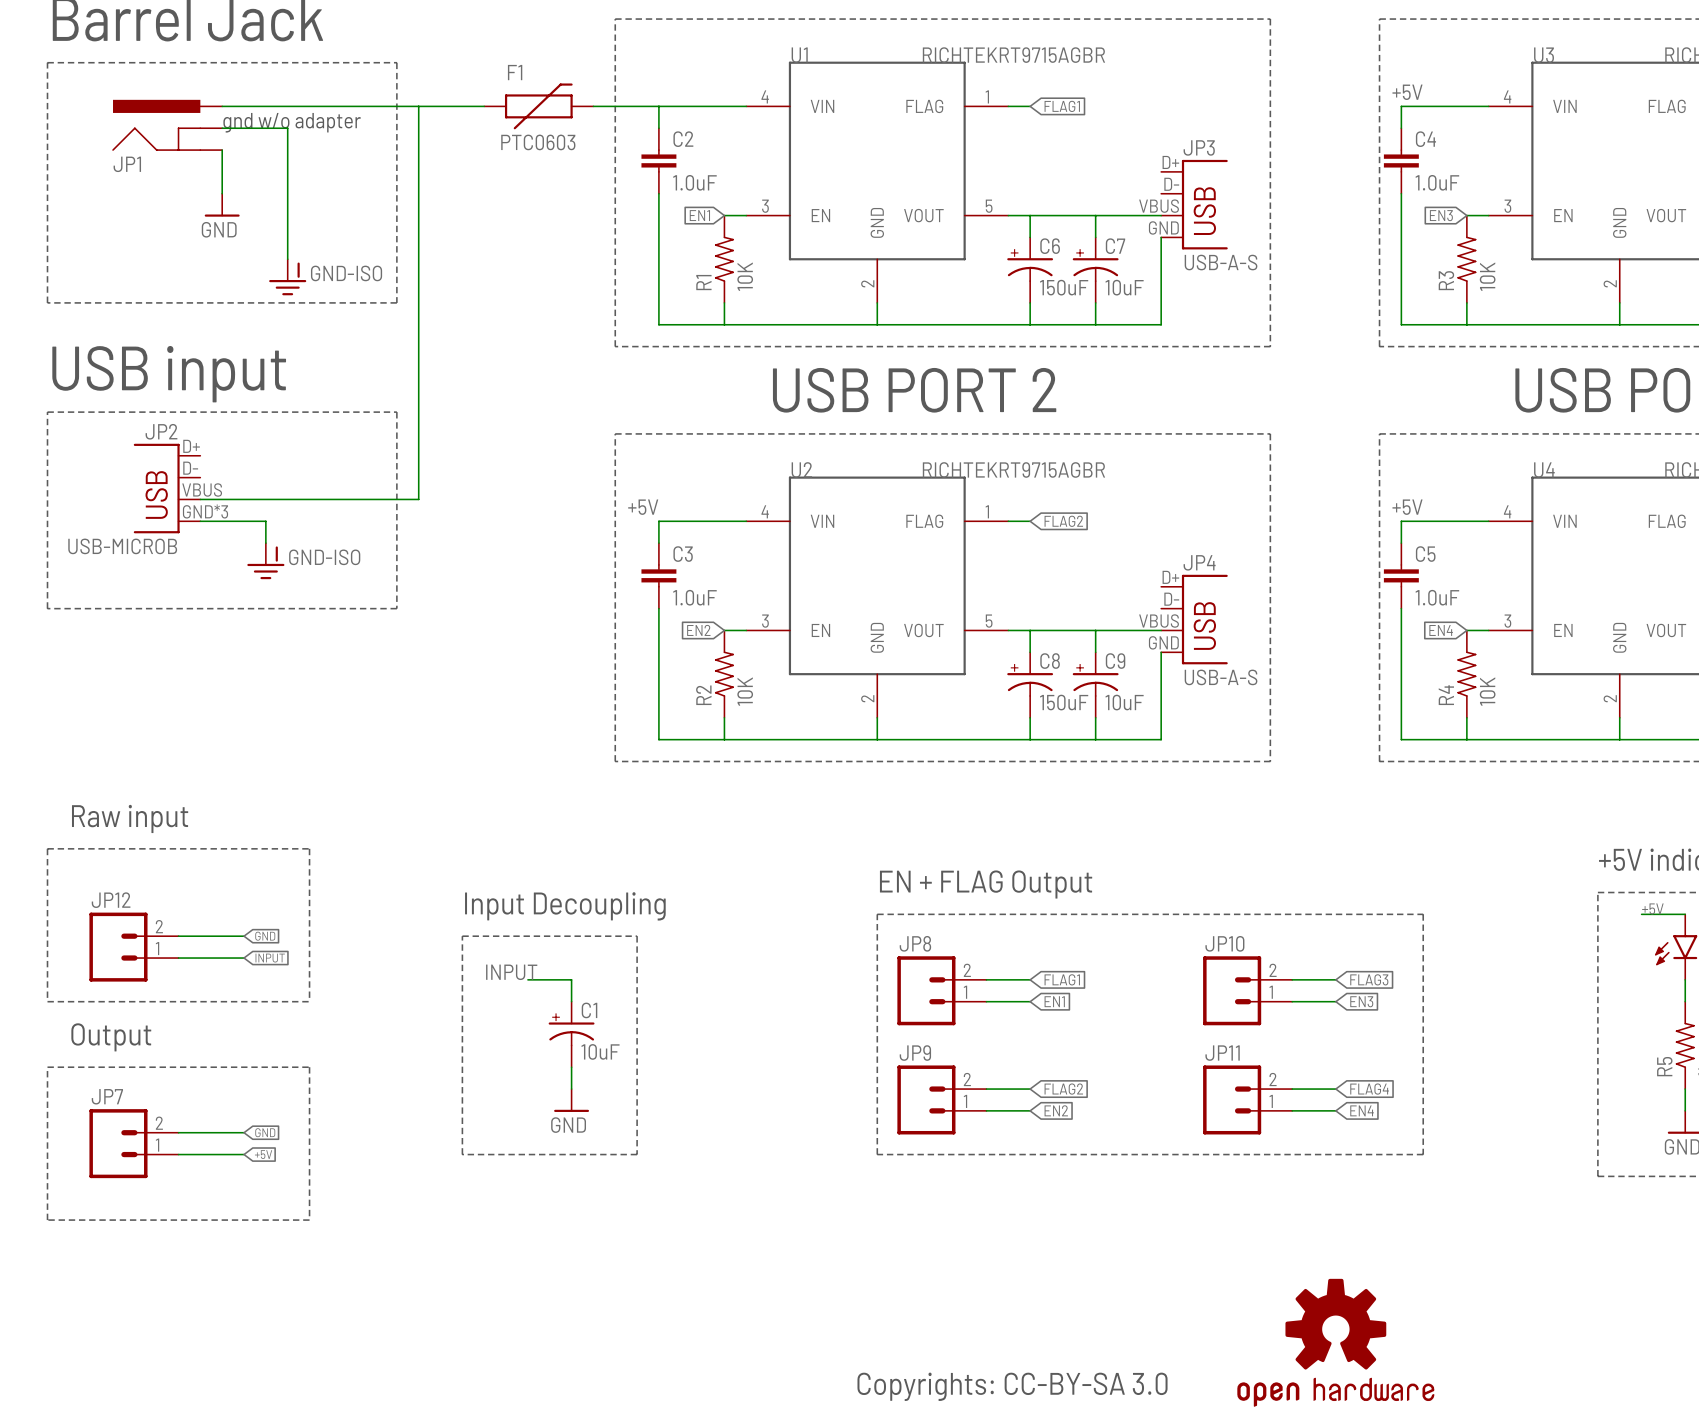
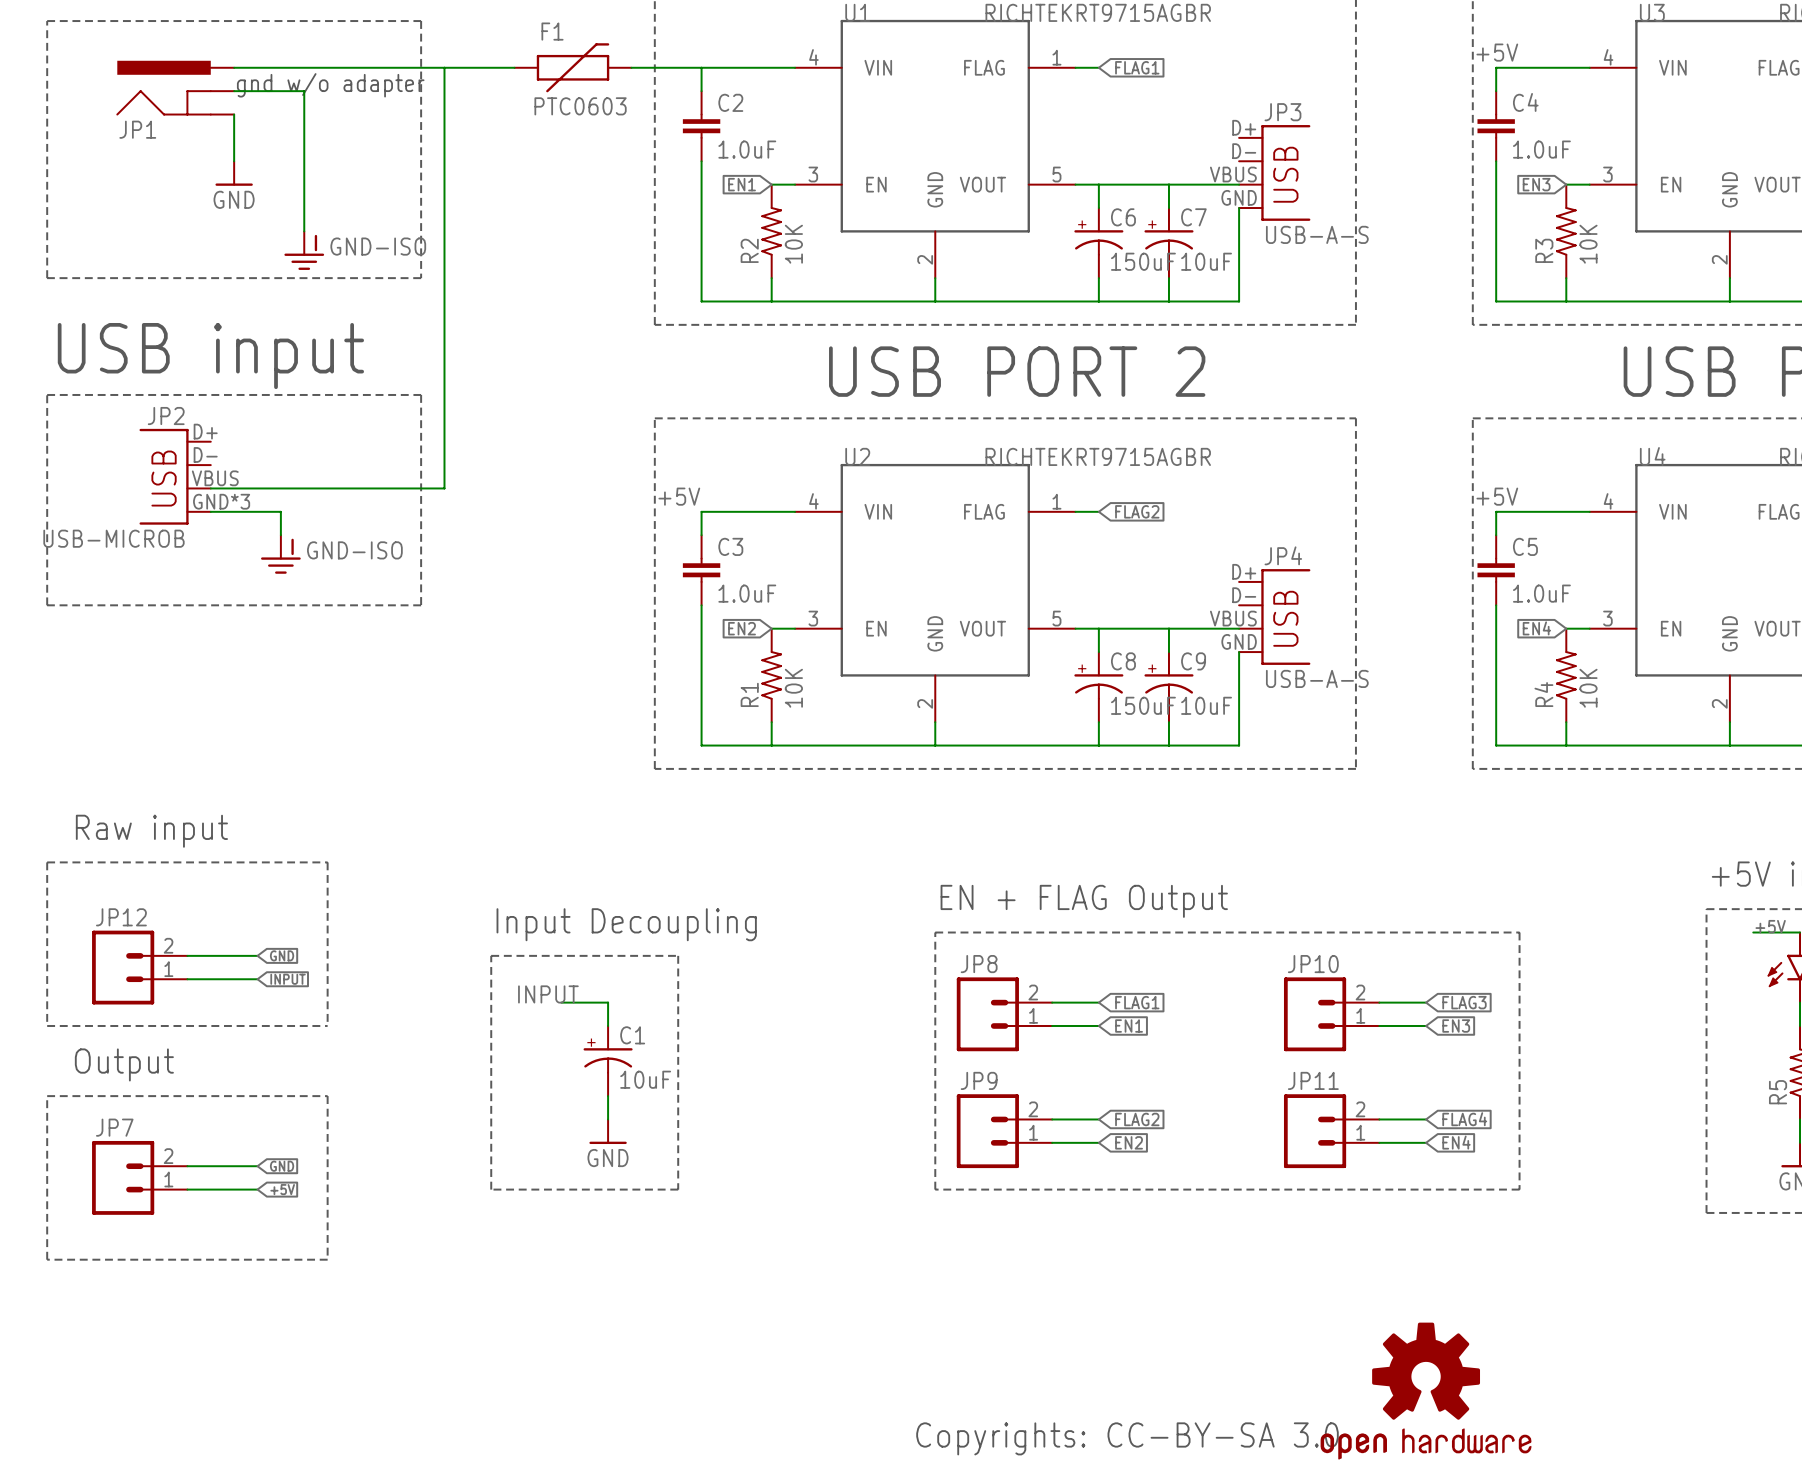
R1 name: R1 (703, 282) -> R2 (749, 250)
R2 name: R2 (703, 695) -> R1 (749, 694)

